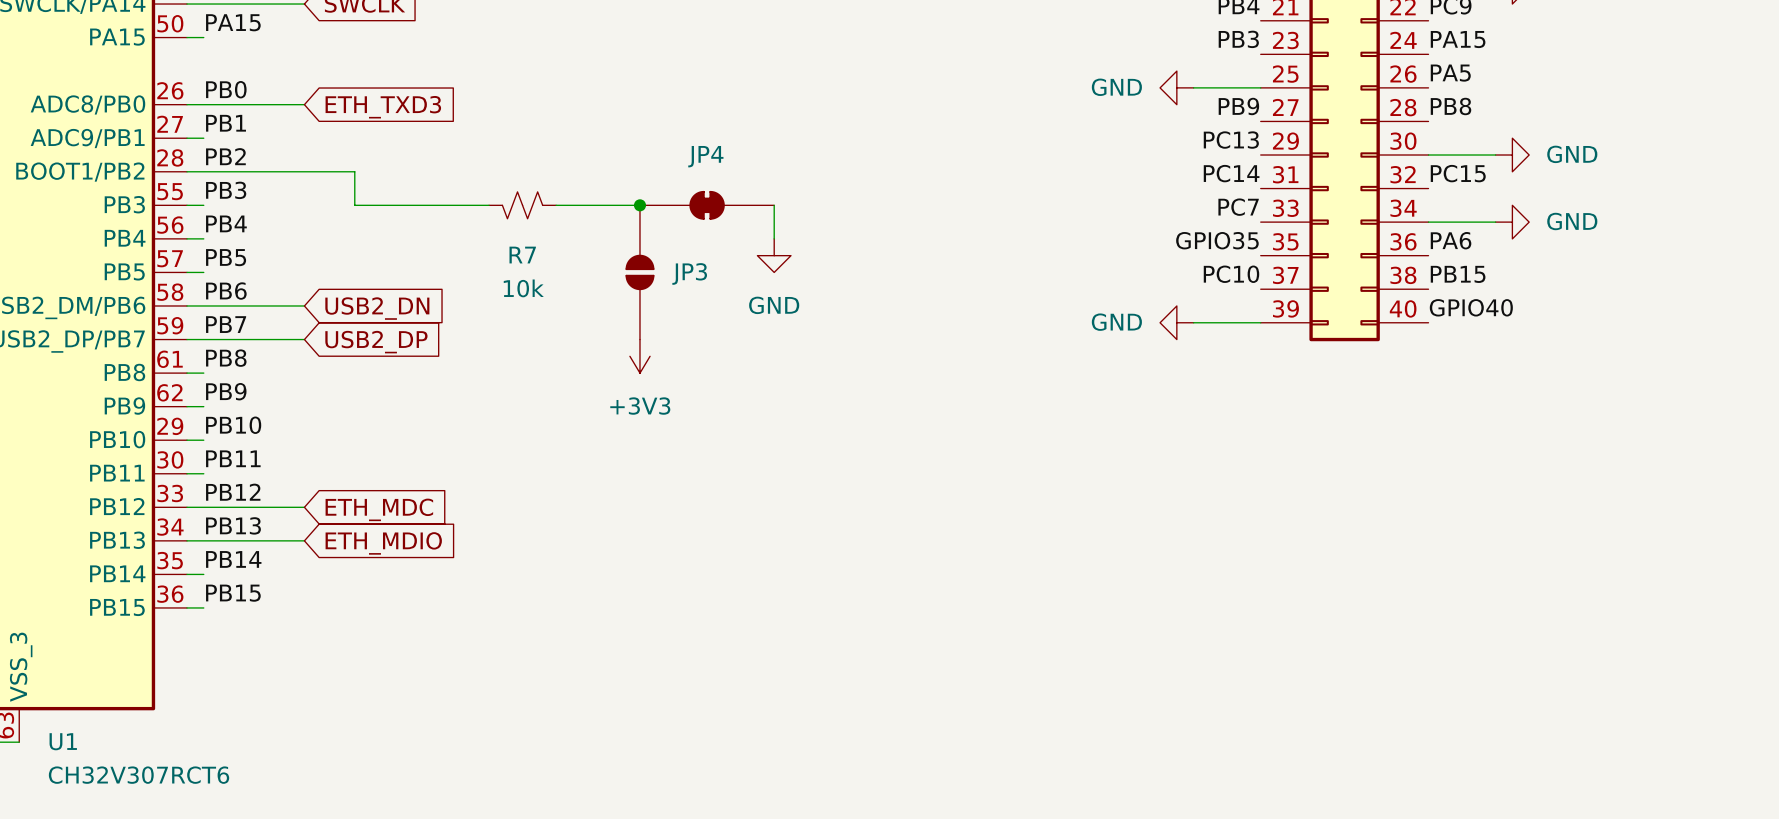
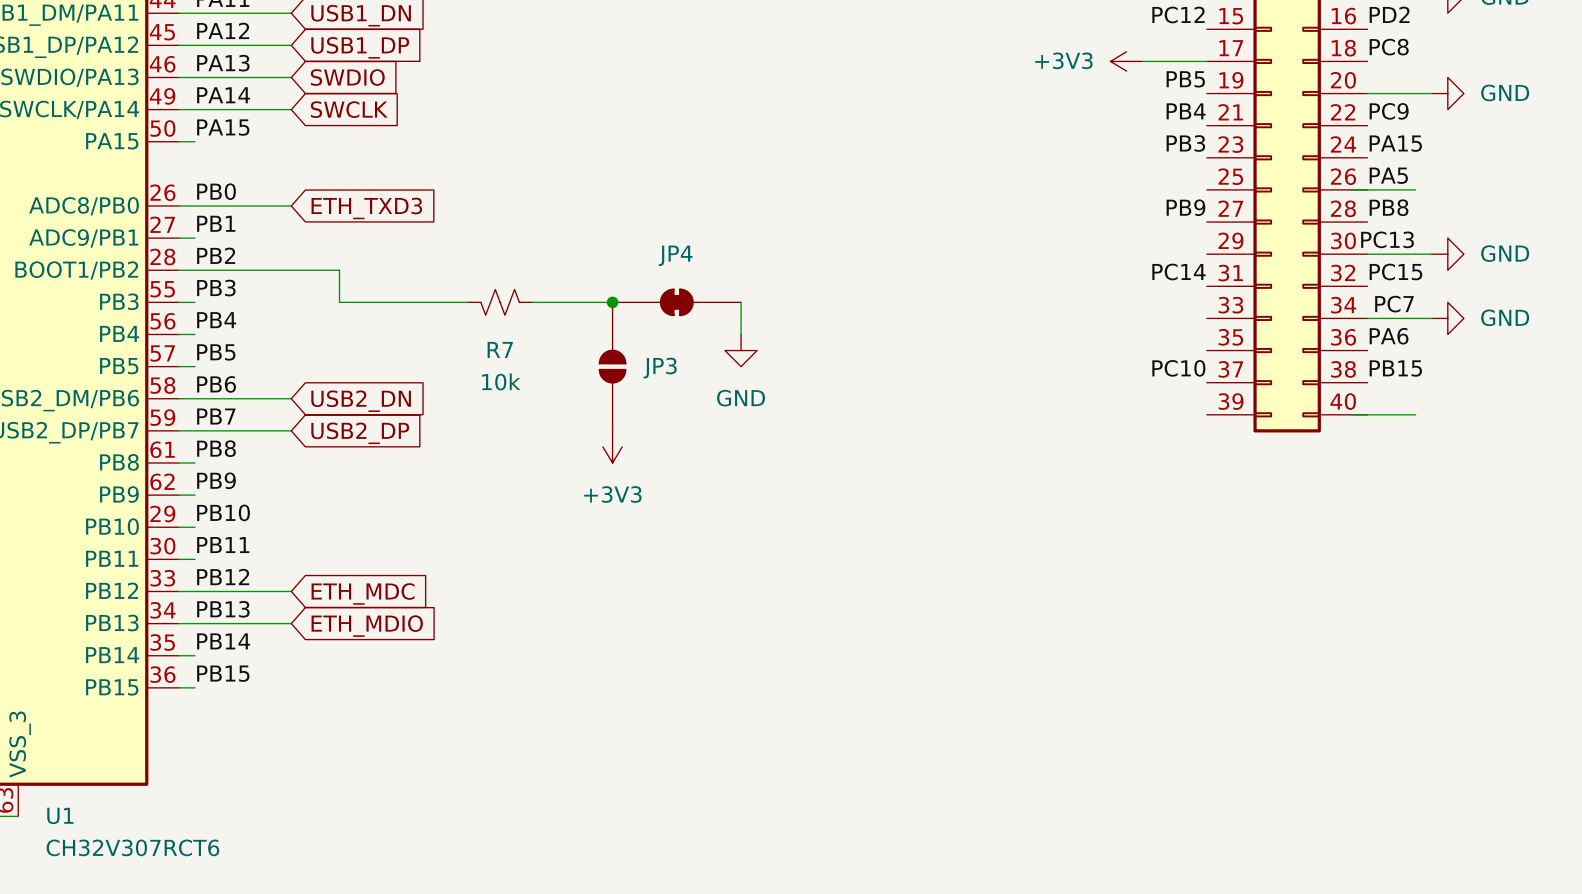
power symbol: GND (1176, 87) -> none
wire: (1193, 87) (1260, 87) -> (1351, 189) (1415, 189)
label position: PC13 (1231, 140) -> PC13 (1387, 239)
label position: PC7 (1238, 207) -> PC7 (1394, 304)
label: GPIO35 (1217, 240) -> none
label: GPIO40 (1471, 307) -> none
power symbol: GND (1176, 322) -> none
wire: (1193, 322) (1260, 322) -> (1351, 414) (1415, 414)

